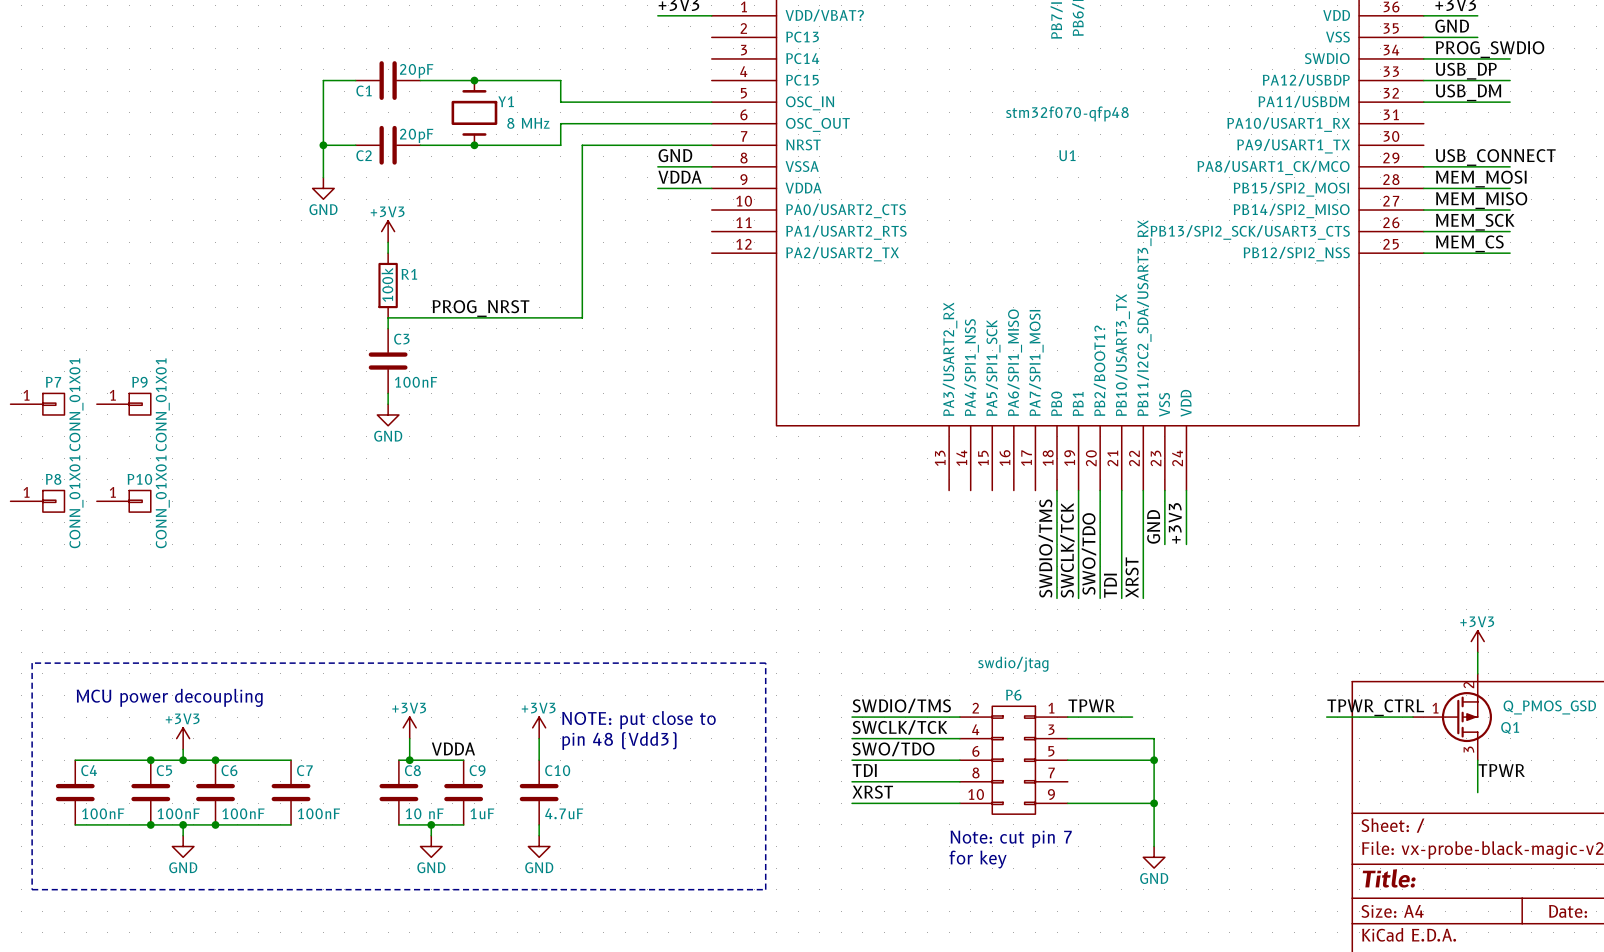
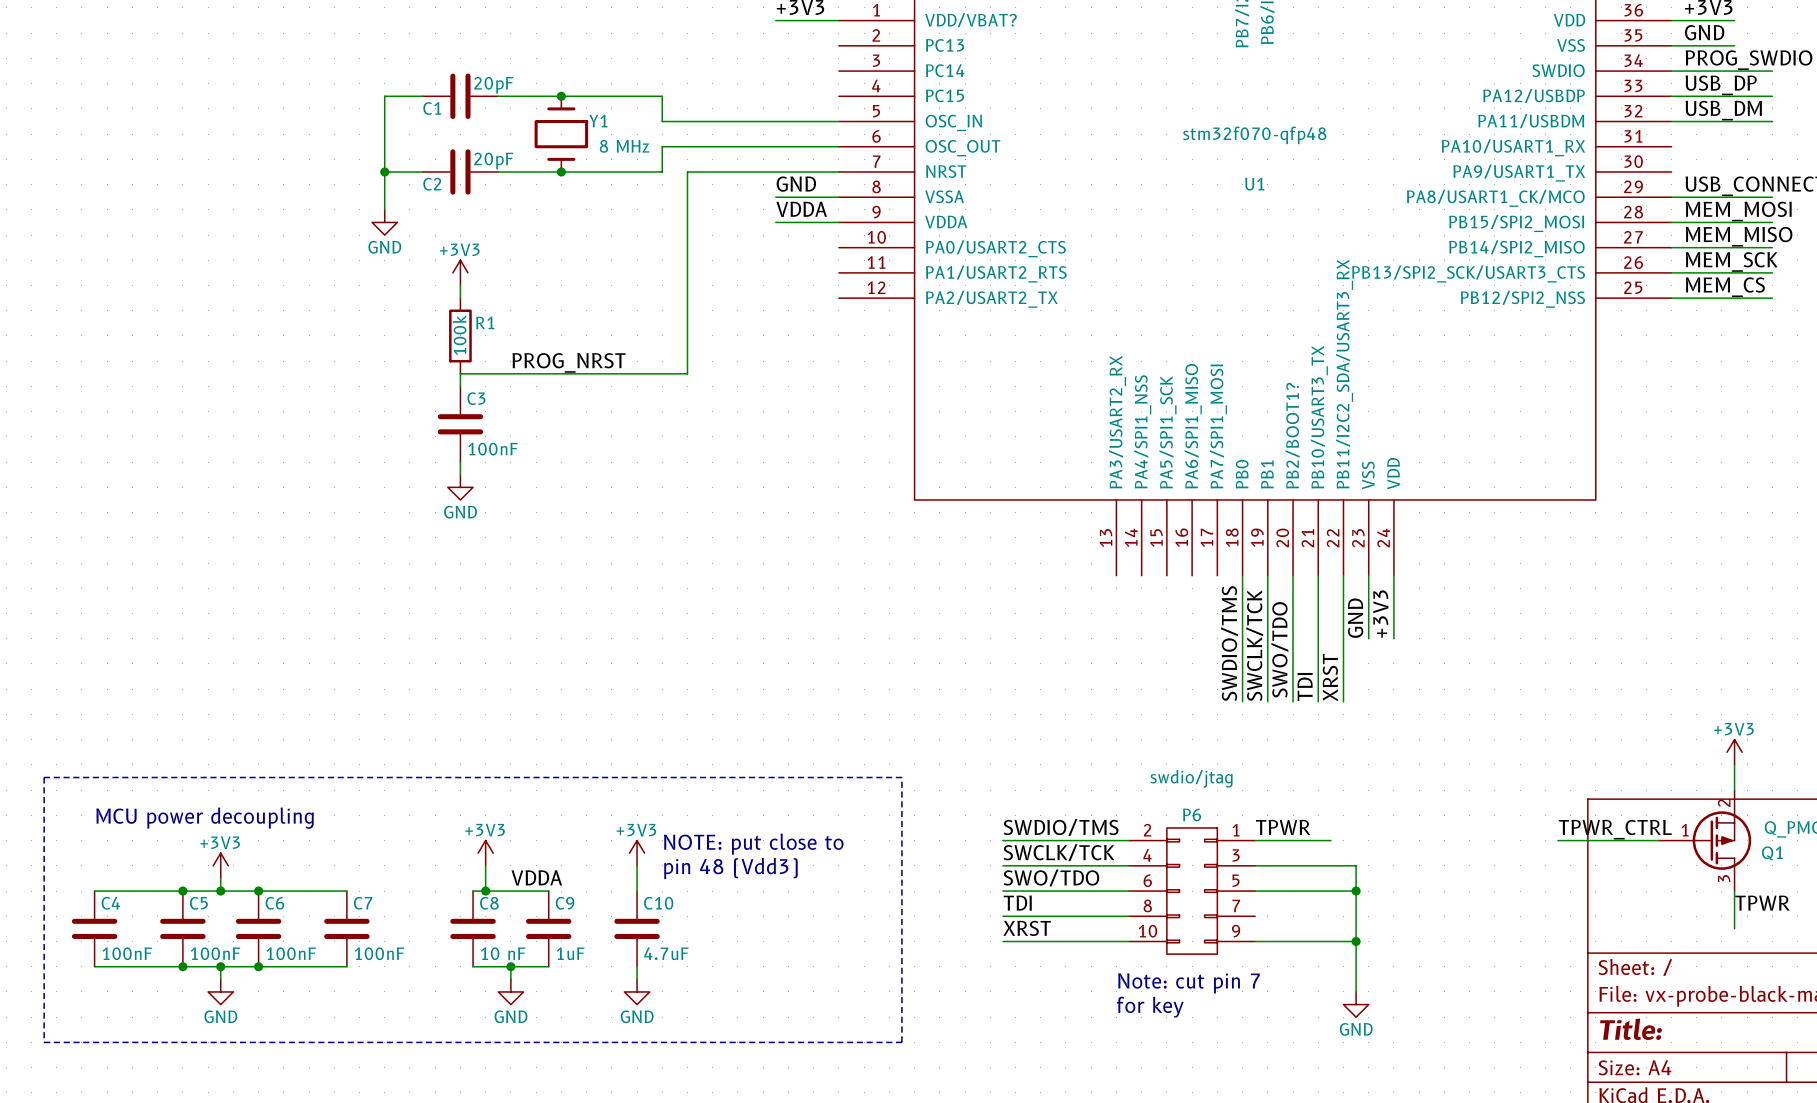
P7: CONN_01X01 (37, 404) -> none
P9: CONN_01X01 (123, 404) -> none
P8: CONN_01X01 (37, 501) -> none
P10: CONN_01X01 (123, 501) -> none

